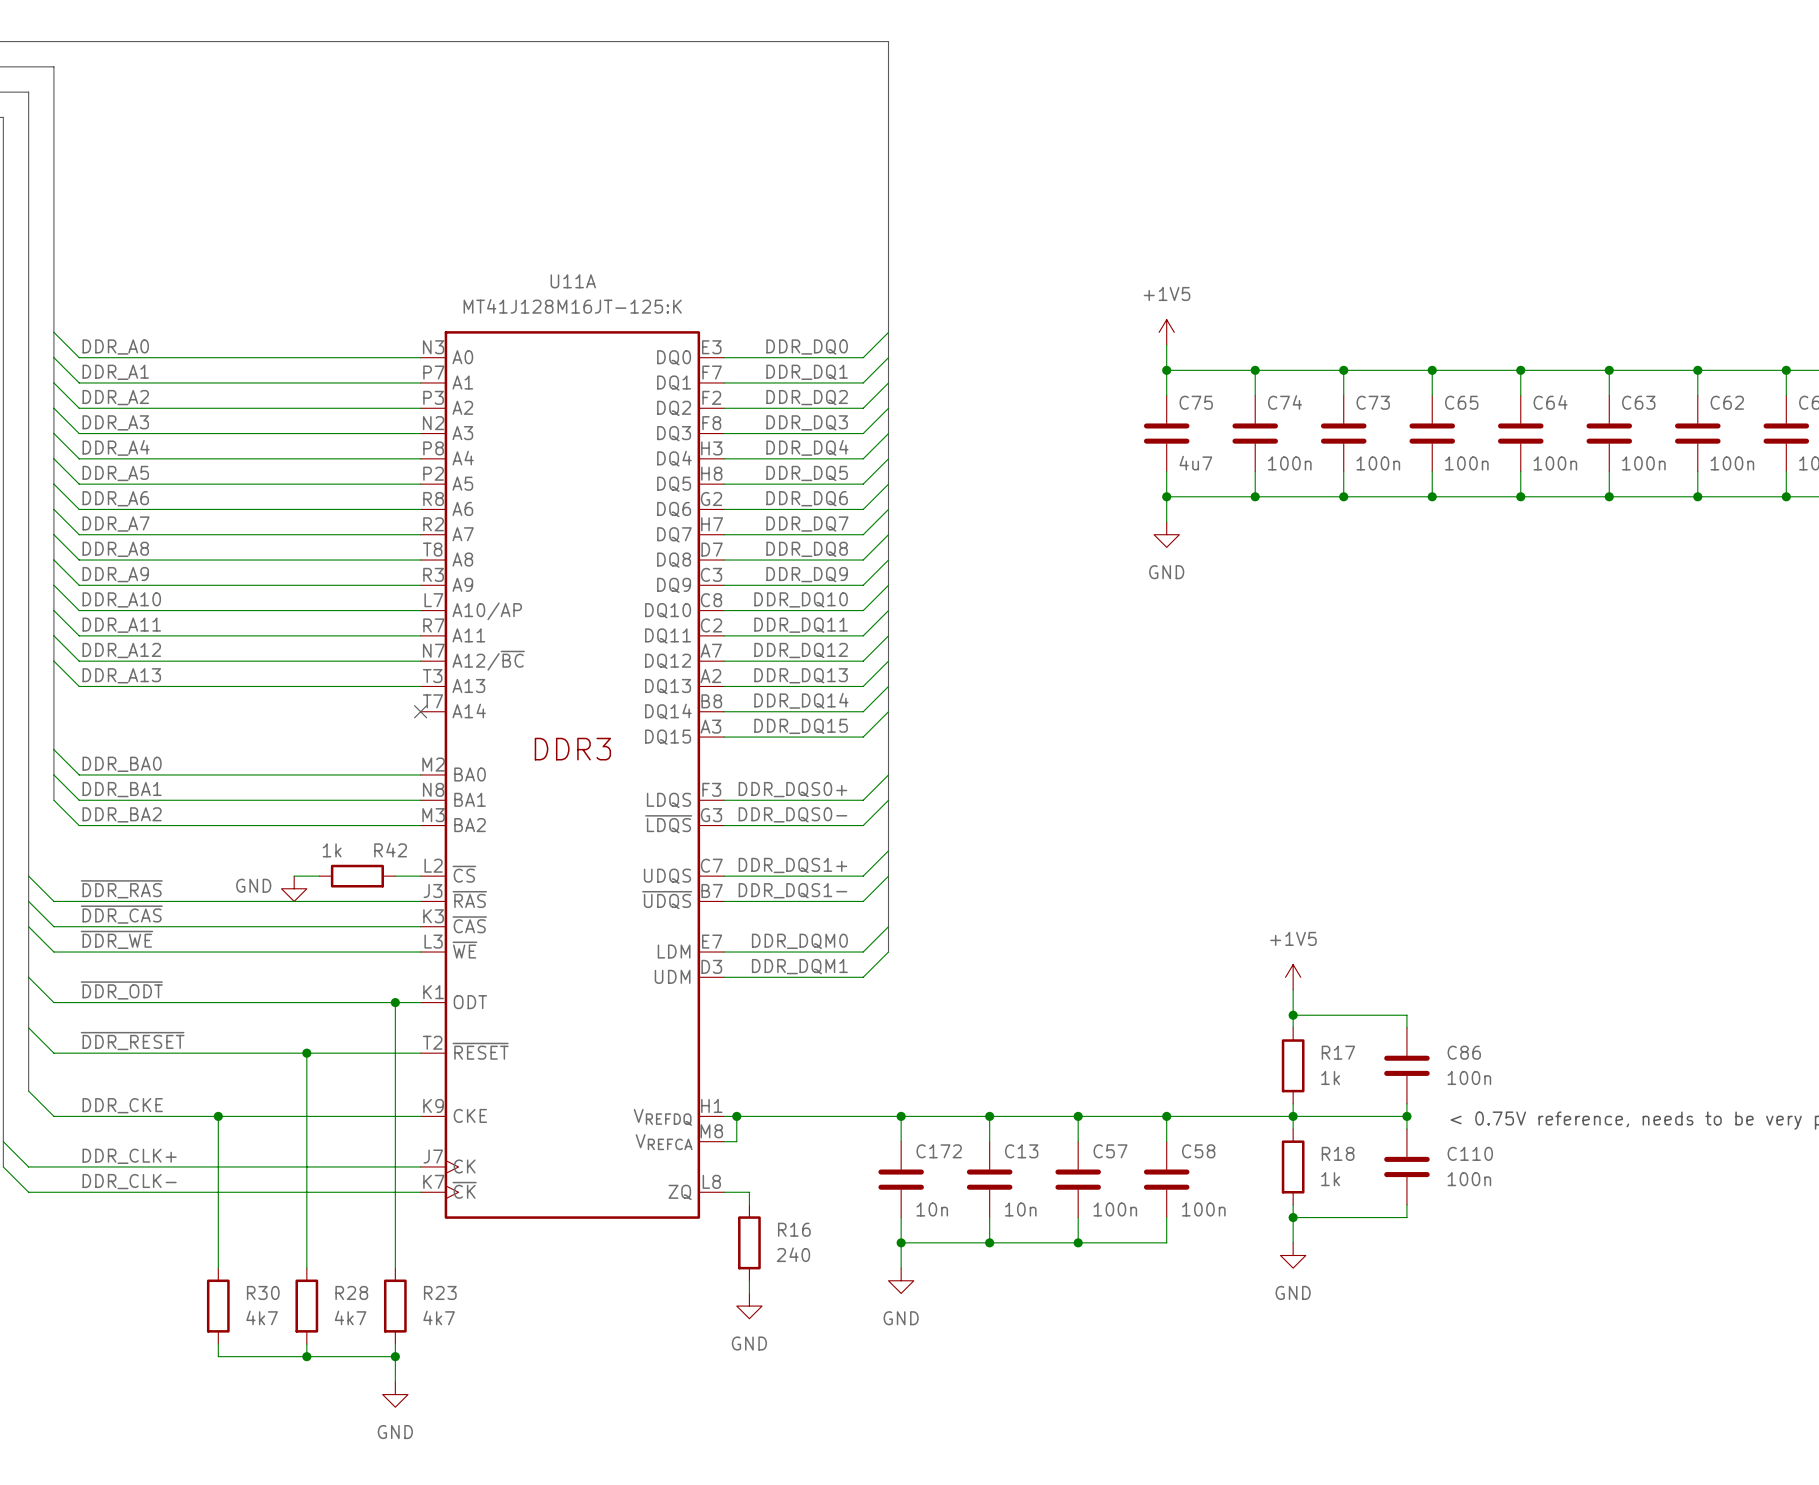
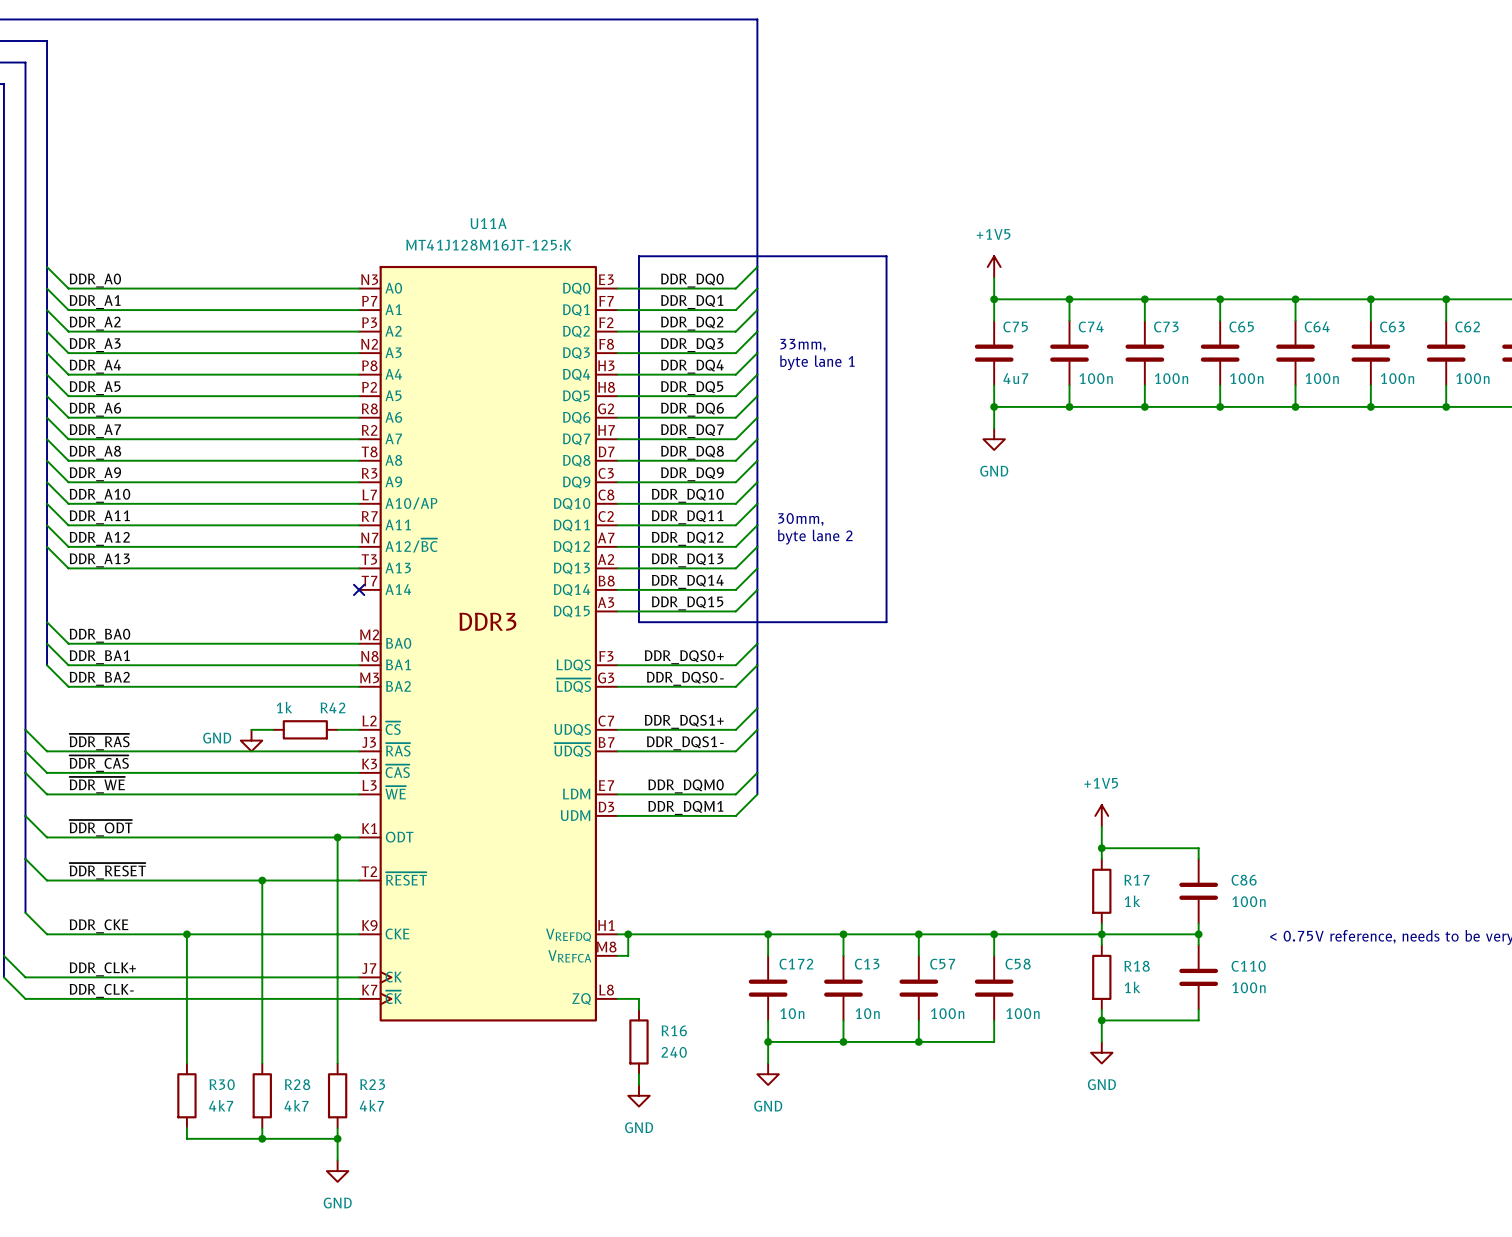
line: none -> (638, 256) (886, 256) (886, 622) (638, 622) (638, 256)
text: none -> 33mm, (802, 345)
text: none -> byte lane 1 (817, 362)
text: none -> 30mm, (800, 519)
text: none -> byte lane 2 (815, 537)

